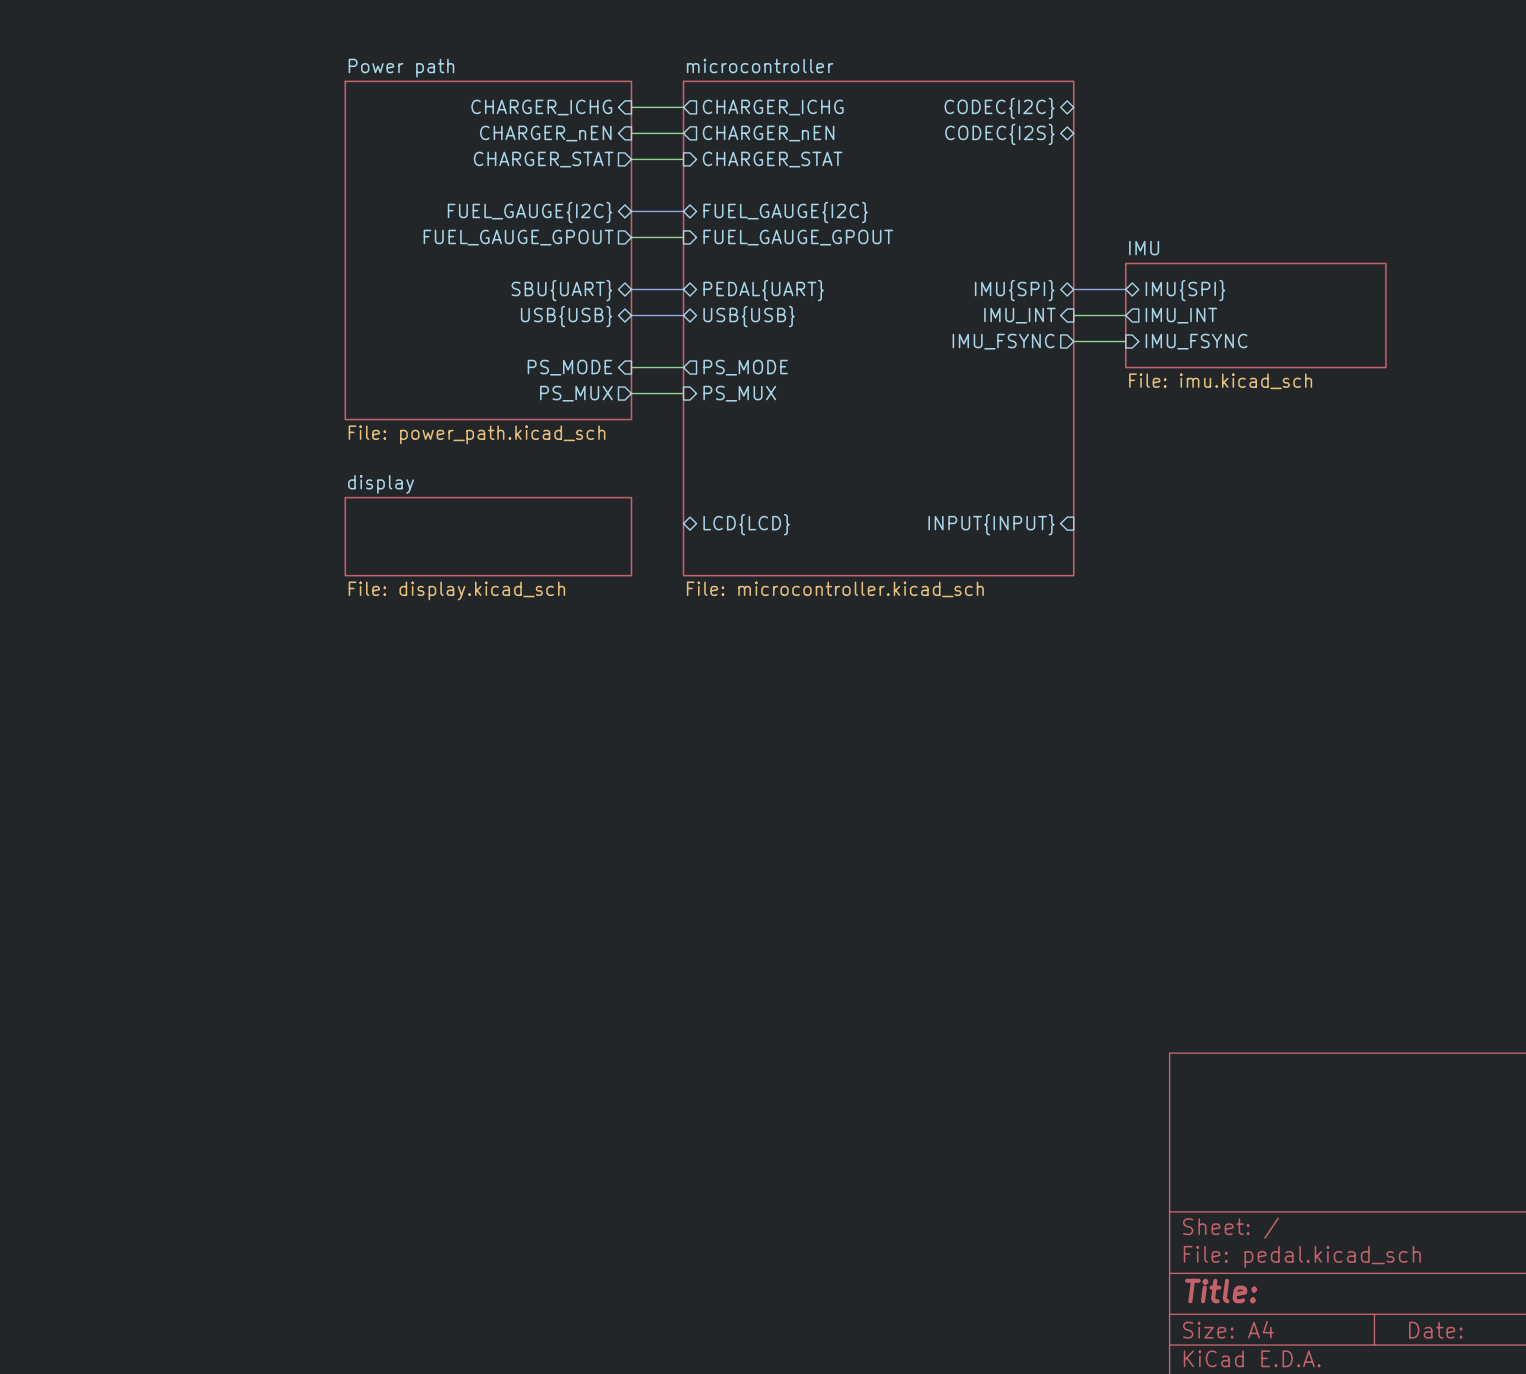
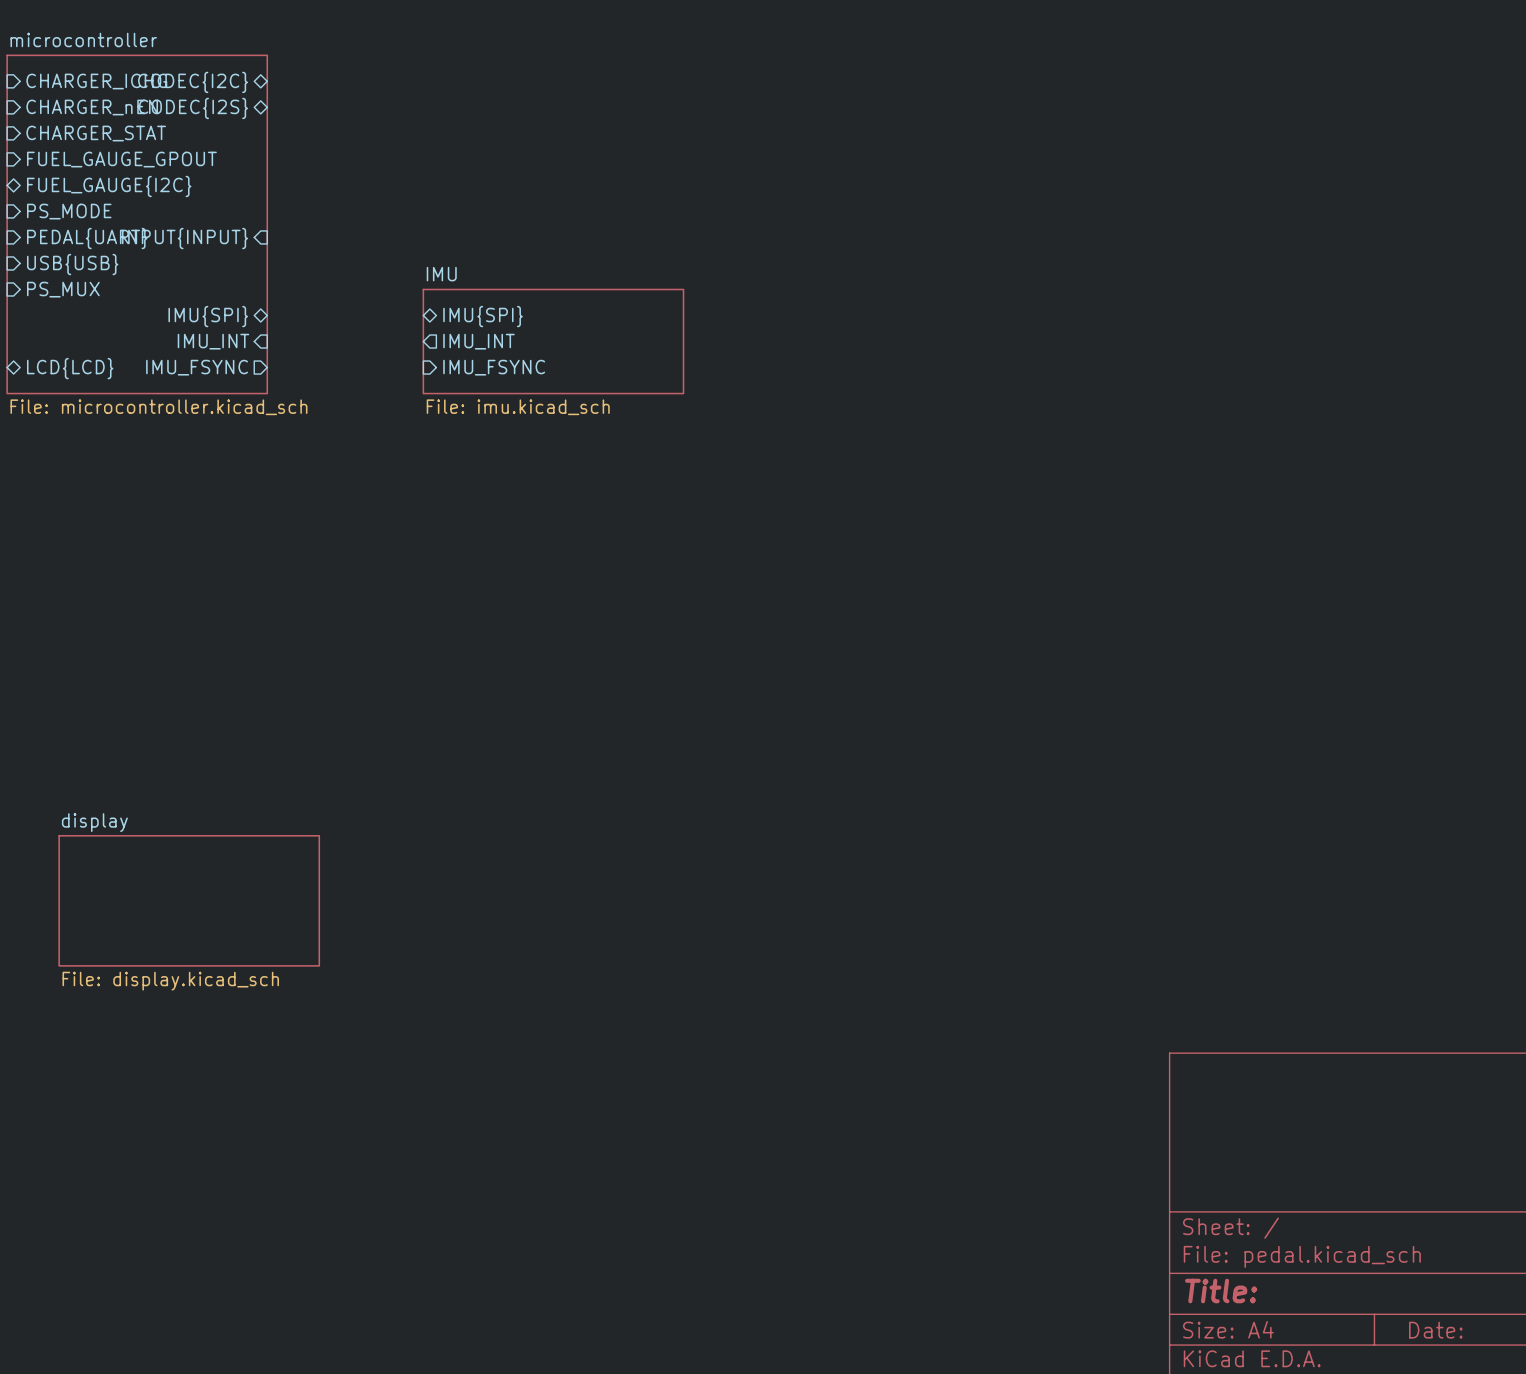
sheet pin: none -> CHARGER_ICHG (96, 81)
sheet pin: none -> CODEC{I2C} (193, 82)
sheet pin: none -> CHARGER_nEN (92, 107)
sheet pin: CHARGER_ICHG (541, 107) -> none
wire: (631, 107) (683, 107) -> none
sheet pin: CHARGER_ICHG (773, 107) -> none
sheet pin: none -> CODEC{I2S} (193, 108)
sheet pin: CODEC{I2C} (999, 108) -> none
sheet pin: none -> CHARGER_STAT (96, 133)
sheet pin: CHARGER_nEN (545, 133) -> none
wire: (631, 133) (683, 133) -> none
sheet pin: CHARGER_nEN (768, 133) -> none
sheet pin: CODEC{I2S} (999, 134) -> none
sheet pin: none -> FUEL_GAUGE_GPOUT (121, 159)
sheet pin: CHARGER_STAT (543, 159) -> none
wire: (631, 159) (683, 159) -> none
sheet pin: CHARGER_STAT (772, 159) -> none
sheet pin: none -> FUEL_GAUGE{I2C} (109, 186)
sheet pin: none -> PS_MODE (69, 211)
bus: (631, 211) (683, 211) -> none
sheet pin: FUEL_GAUGE{I2C} (530, 212) -> none
sheet pin: FUEL_GAUGE{I2C} (785, 212) -> none
sheet microcontroller: none -> File: microcontroller.kicad_sch (137, 224)
sheet pin: FUEL_GAUGE_GPOUT (518, 237) -> none
wire: (631, 237) (683, 237) -> none
sheet pin: FUEL_GAUGE_GPOUT (798, 237) -> none
sheet pin: none -> PEDAL{UART} (87, 238)
sheet pin: none -> INPUT{INPUT} (184, 238)
sheet Power path: File: power_path.kicad_sch (488, 250) -> none
sheet pin: none -> USB{USB} (72, 264)
sheet pin: none -> PS_MUX (63, 289)
bus: (631, 289) (683, 289) -> none
bus: (1073, 289) (1125, 289) -> none
sheet pin: SBU{UART} (561, 290) -> none
sheet pin: PEDAL{UART} (763, 290) -> none
sheet pin: IMU{SPI} (1014, 290) -> none
sheet pin: IMU{SPI} (1185, 290) -> none
bus: (631, 315) (683, 315) -> none
sheet pin: IMU_INT (1019, 315) -> none
wire: (1073, 315) (1125, 315) -> none
sheet pin: IMU_INT (1181, 315) -> none
sheet IMU: File: imu.kicad_sch (1255, 315) -> none
sheet pin: none -> IMU{SPI} (208, 316)
sheet pin: none -> IMU{SPI} (483, 316)
sheet pin: USB{USB} (566, 316) -> none
sheet pin: USB{USB} (749, 316) -> none
sheet microcontroller: File: microcontroller.kicad_sch (878, 328) -> none
sheet pin: none -> IMU_INT (213, 341)
sheet pin: none -> IMU_INT (479, 341)
sheet IMU: none -> File: imu.kicad_sch (553, 341)
sheet pin: IMU_FSYNC (1003, 341) -> none
wire: (1073, 341) (1125, 341) -> none
sheet pin: IMU_FSYNC (1196, 341) -> none
sheet pin: none -> IMU_FSYNC (197, 367)
sheet pin: none -> IMU_FSYNC (494, 367)
sheet pin: PS_MODE (569, 367) -> none
wire: (631, 367) (683, 367) -> none
sheet pin: PS_MODE (745, 367) -> none
sheet pin: none -> LCD{LCD} (70, 368)
sheet pin: PS_MUX (576, 393) -> none
sheet pin: PS_MUX (739, 393) -> none
sheet pin: LCD{LCD} (746, 524) -> none
sheet pin: INPUT{INPUT} (991, 524) -> none
sheet display: File: display.kicad_sch (488, 536) -> none
sheet display: none -> File: display.kicad_sch (189, 900)

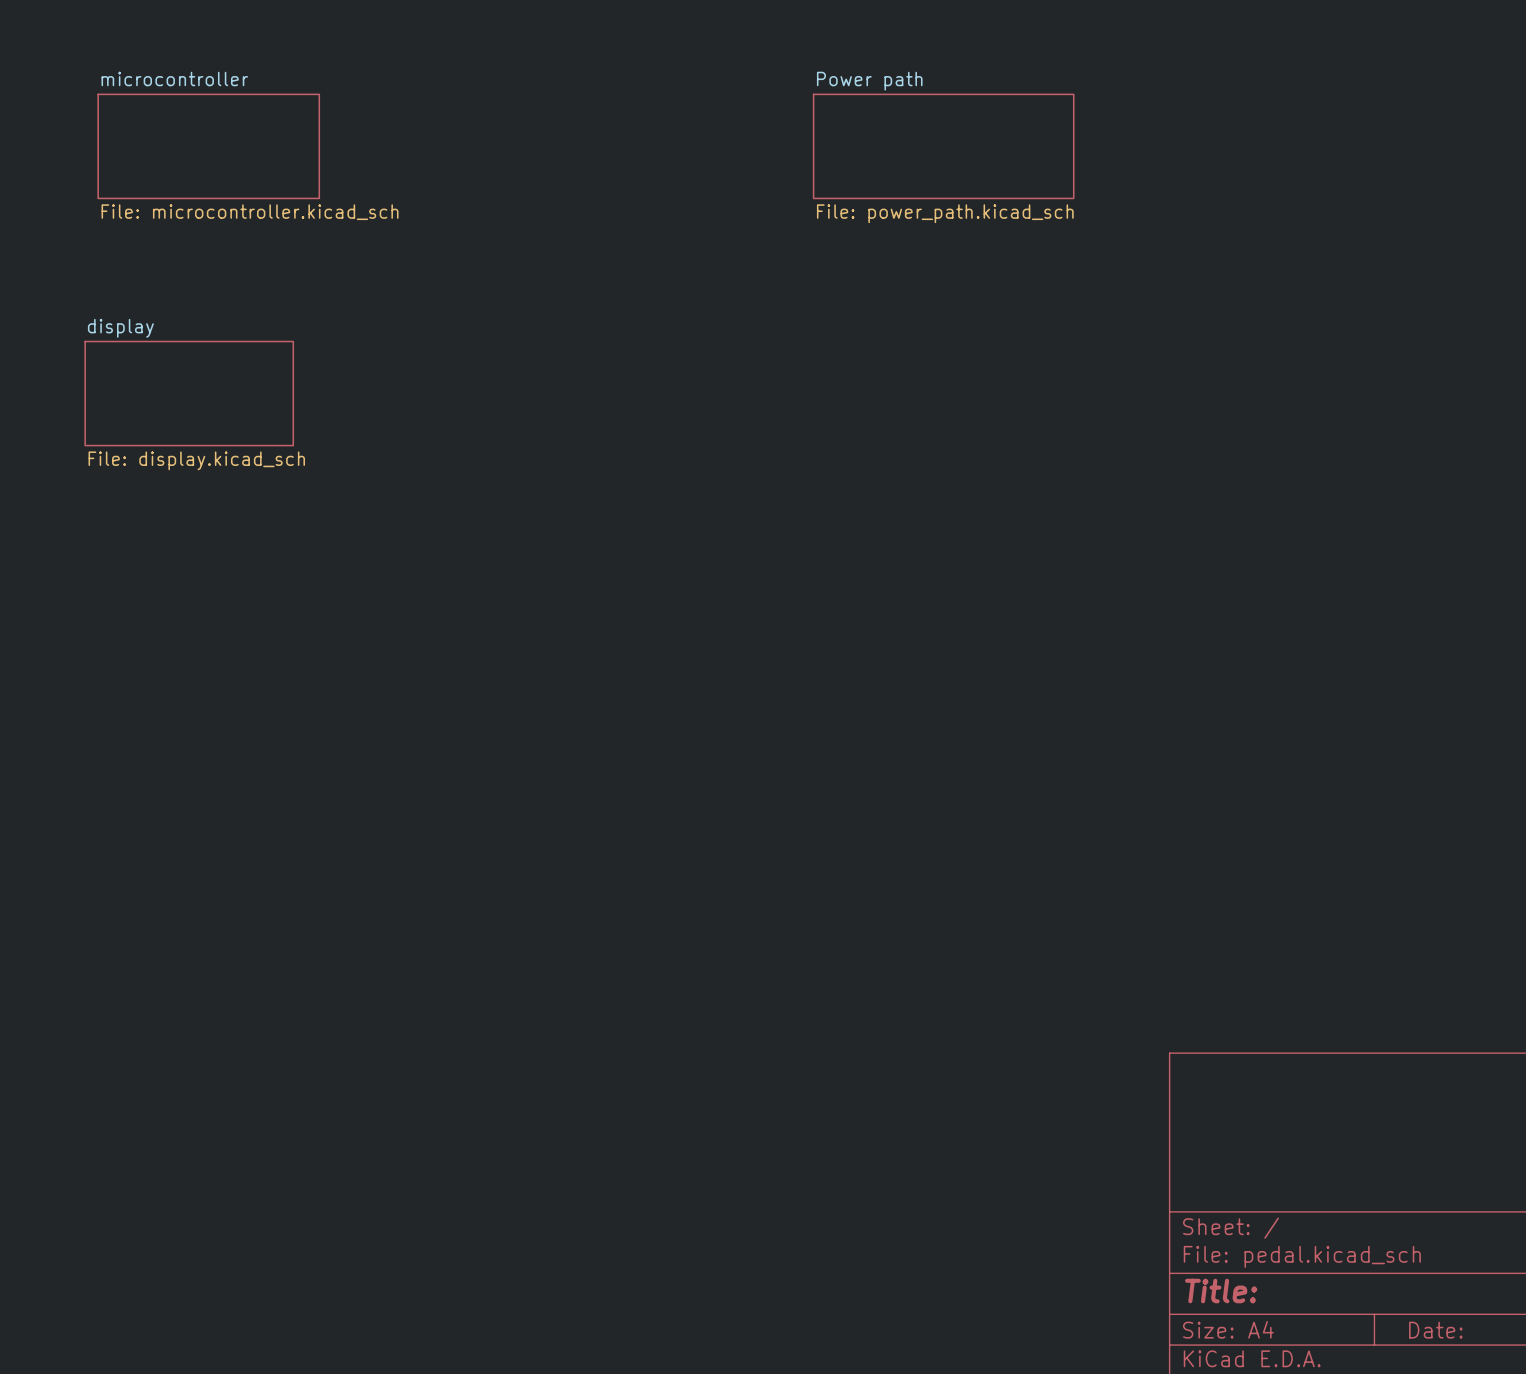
sheet pin: CHARGER_ICHG (96, 81) -> none
sheet pin: CODEC{I2C} (193, 82) -> none
sheet pin: CHARGER_nEN (92, 107) -> none
sheet pin: CODEC{I2S} (193, 108) -> none
sheet pin: CHARGER_STAT (96, 133) -> none
sheet microcontroller: none -> File: microcontroller.kicad_sch (208, 146)
sheet Power path: none -> File: power_path.kicad_sch (943, 146)
sheet pin: FUEL_GAUGE_GPOUT (121, 159) -> none
sheet pin: FUEL_GAUGE{I2C} (109, 186) -> none
sheet pin: PS_MODE (69, 211) -> none
sheet microcontroller: File: microcontroller.kicad_sch (137, 224) -> none
sheet pin: PEDAL{UART} (87, 238) -> none
sheet pin: INPUT{INPUT} (184, 238) -> none
sheet pin: USB{USB} (72, 264) -> none
sheet pin: PS_MUX (63, 289) -> none
sheet pin: IMU{SPI} (208, 316) -> none
sheet pin: IMU{SPI} (483, 316) -> none
sheet pin: IMU_INT (213, 341) -> none
sheet pin: IMU_INT (479, 341) -> none
sheet IMU: File: imu.kicad_sch (553, 341) -> none
sheet pin: IMU_FSYNC (197, 367) -> none
sheet pin: IMU_FSYNC (494, 367) -> none
sheet pin: LCD{LCD} (70, 368) -> none
sheet display: none -> File: display.kicad_sch (189, 393)
sheet display: File: display.kicad_sch (189, 900) -> none

